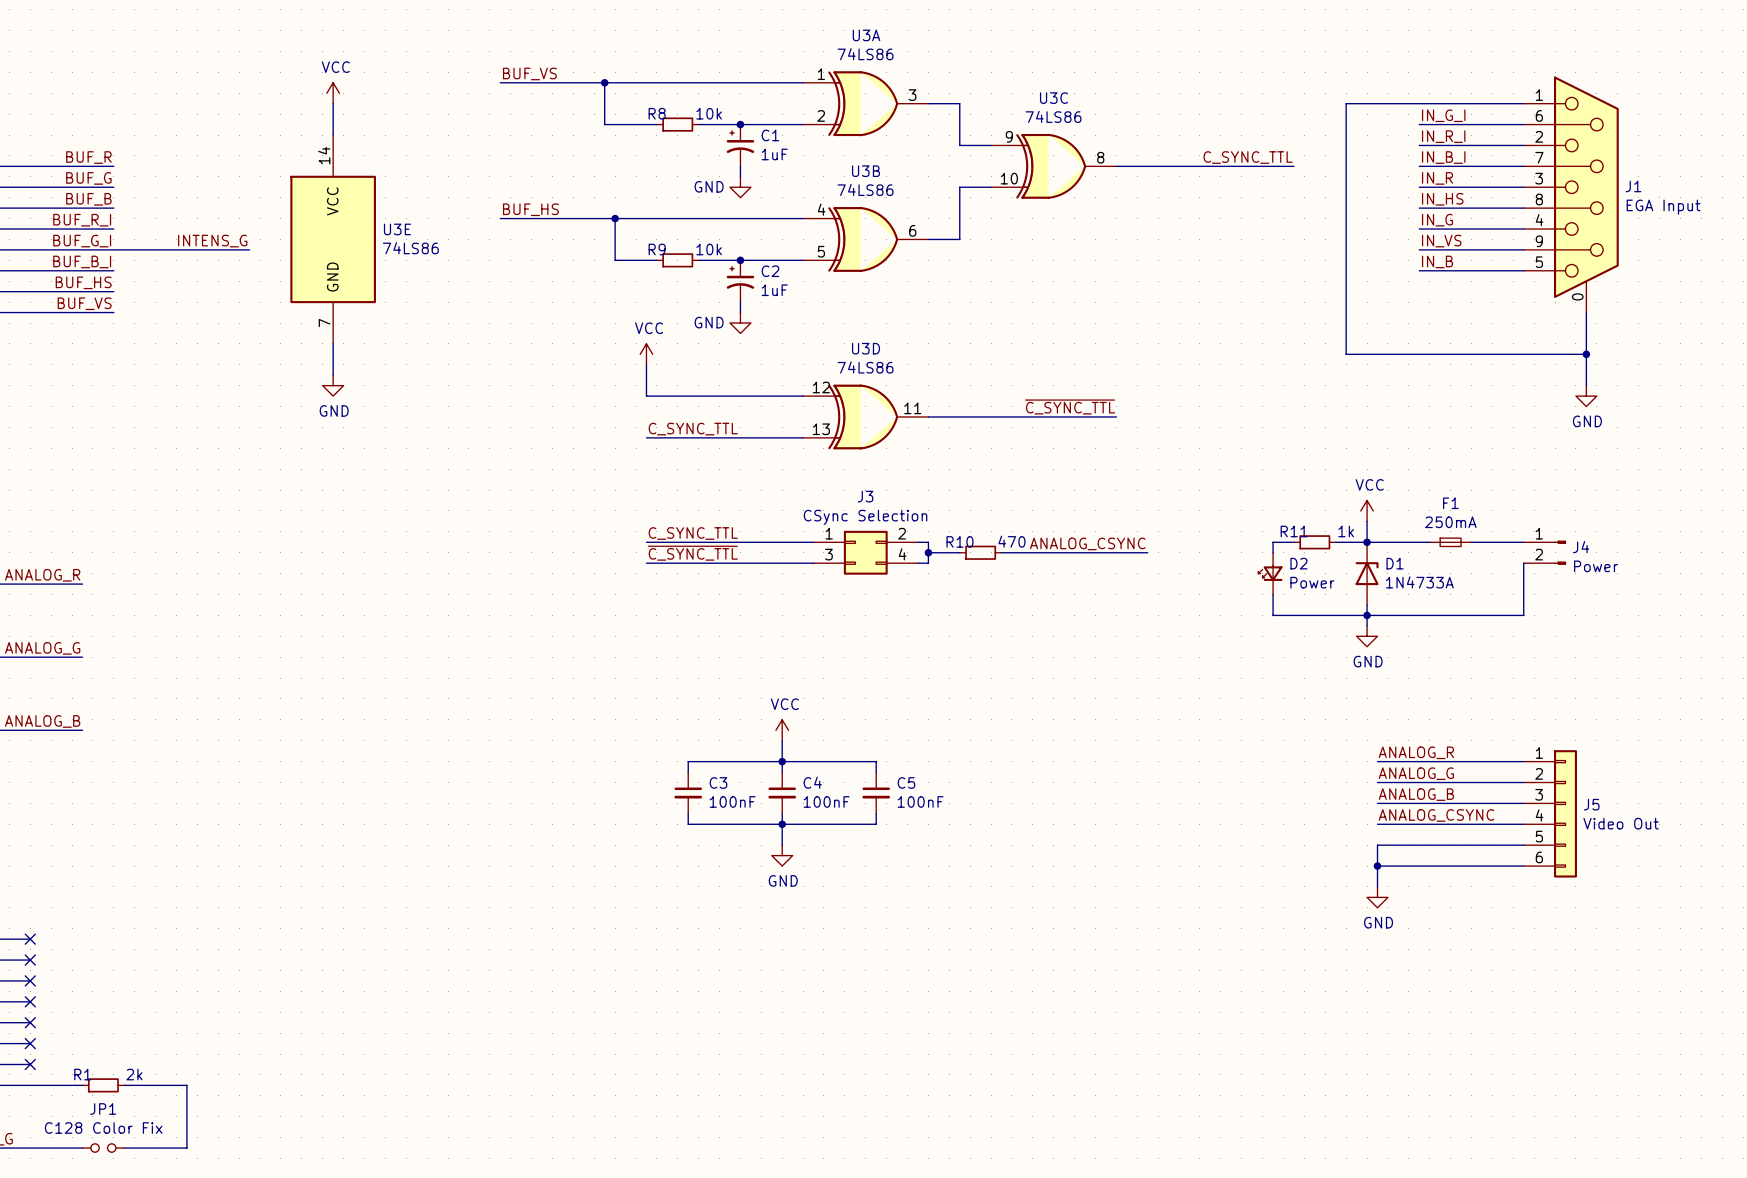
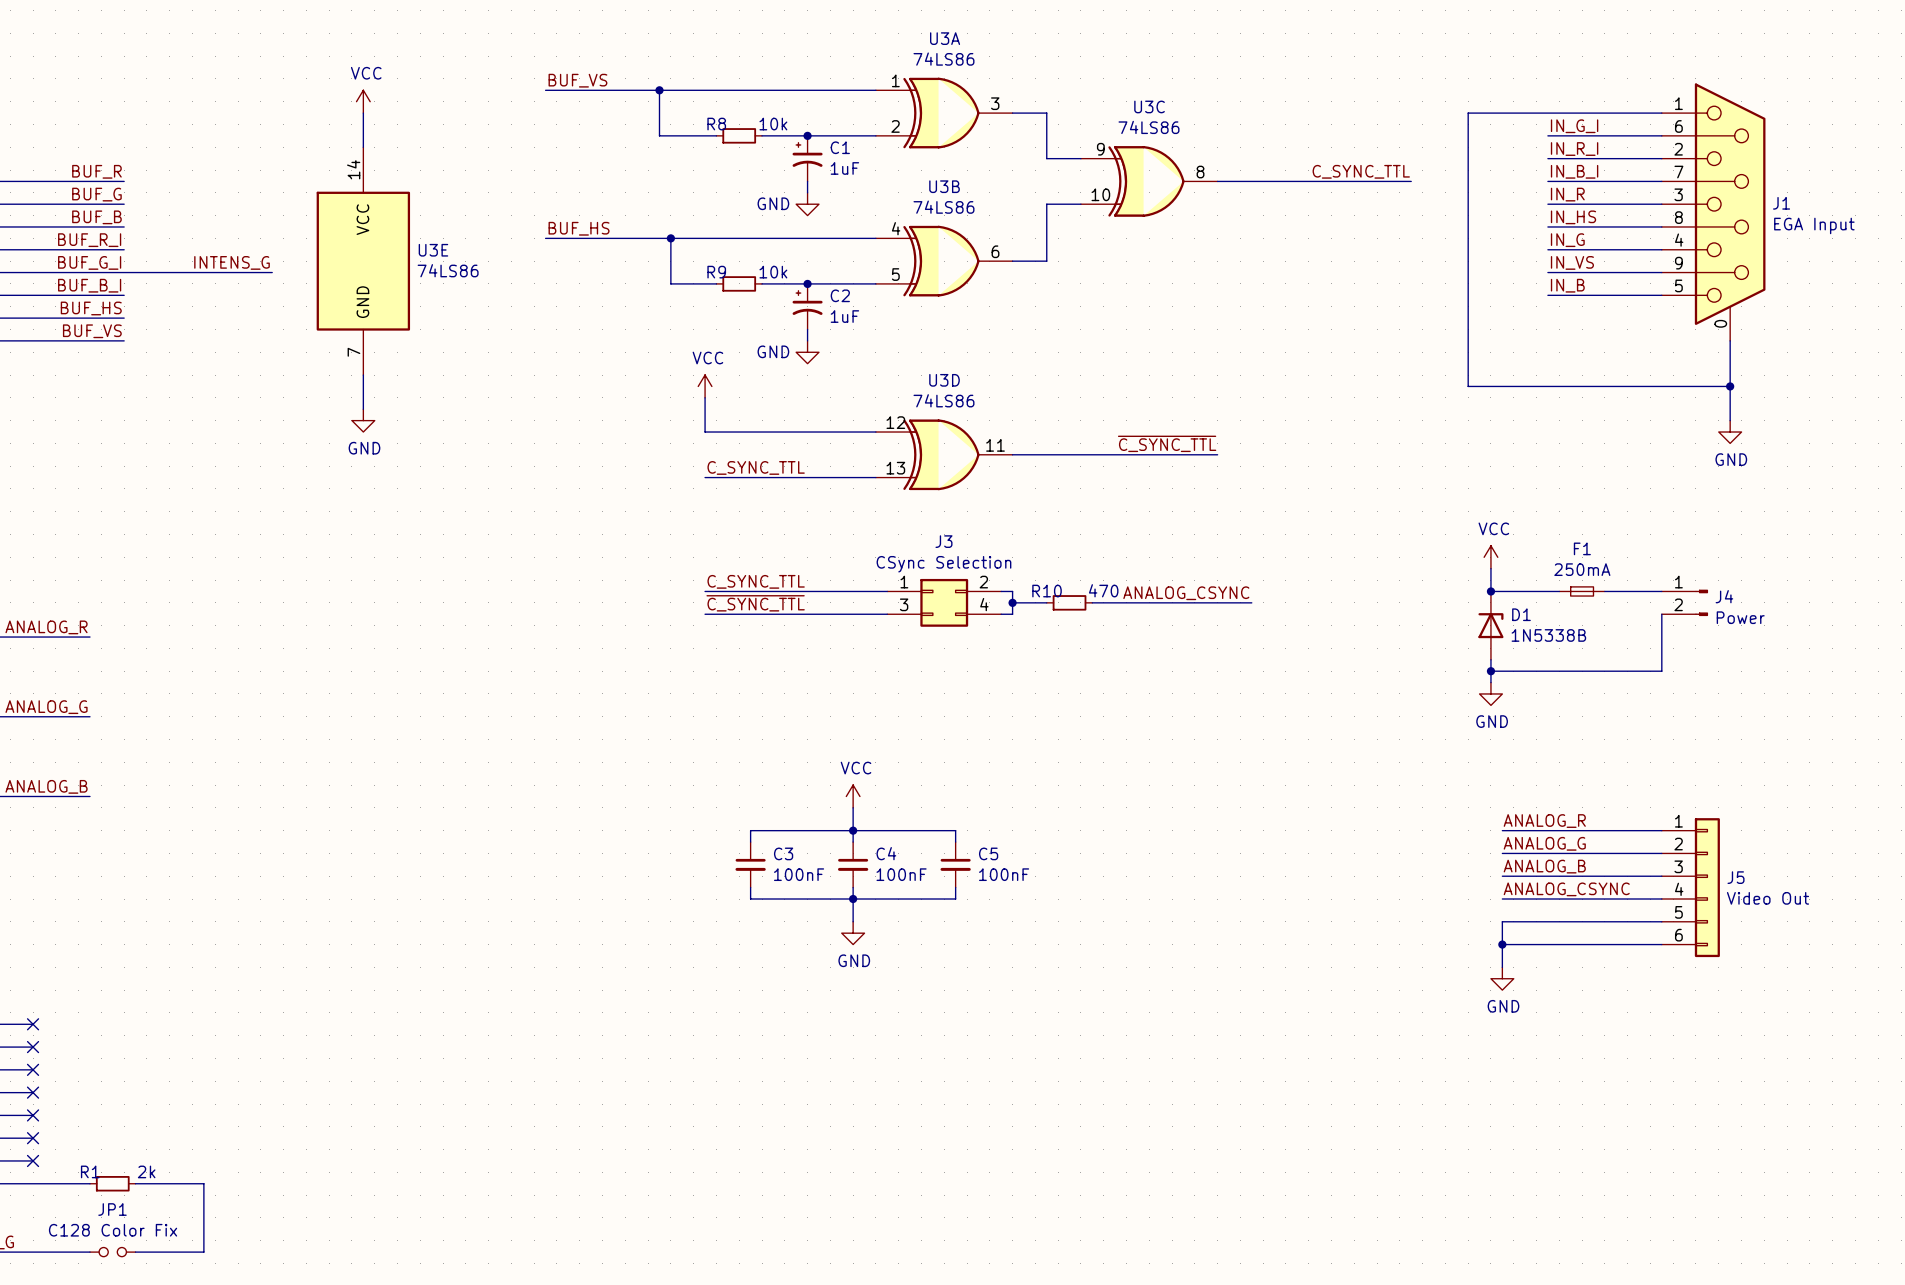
wire: (1293, 542) (1273, 542) (1273, 552) -> none
R11: 1k (1314, 542) -> none
wire: (1335, 542) (1367, 542) -> none
D2: Power (1270, 573) -> none
D1 value: 1N4733A (1419, 582) -> 1N5338B (1548, 635)
wire: (1273, 594) (1273, 615) (1367, 615) -> none

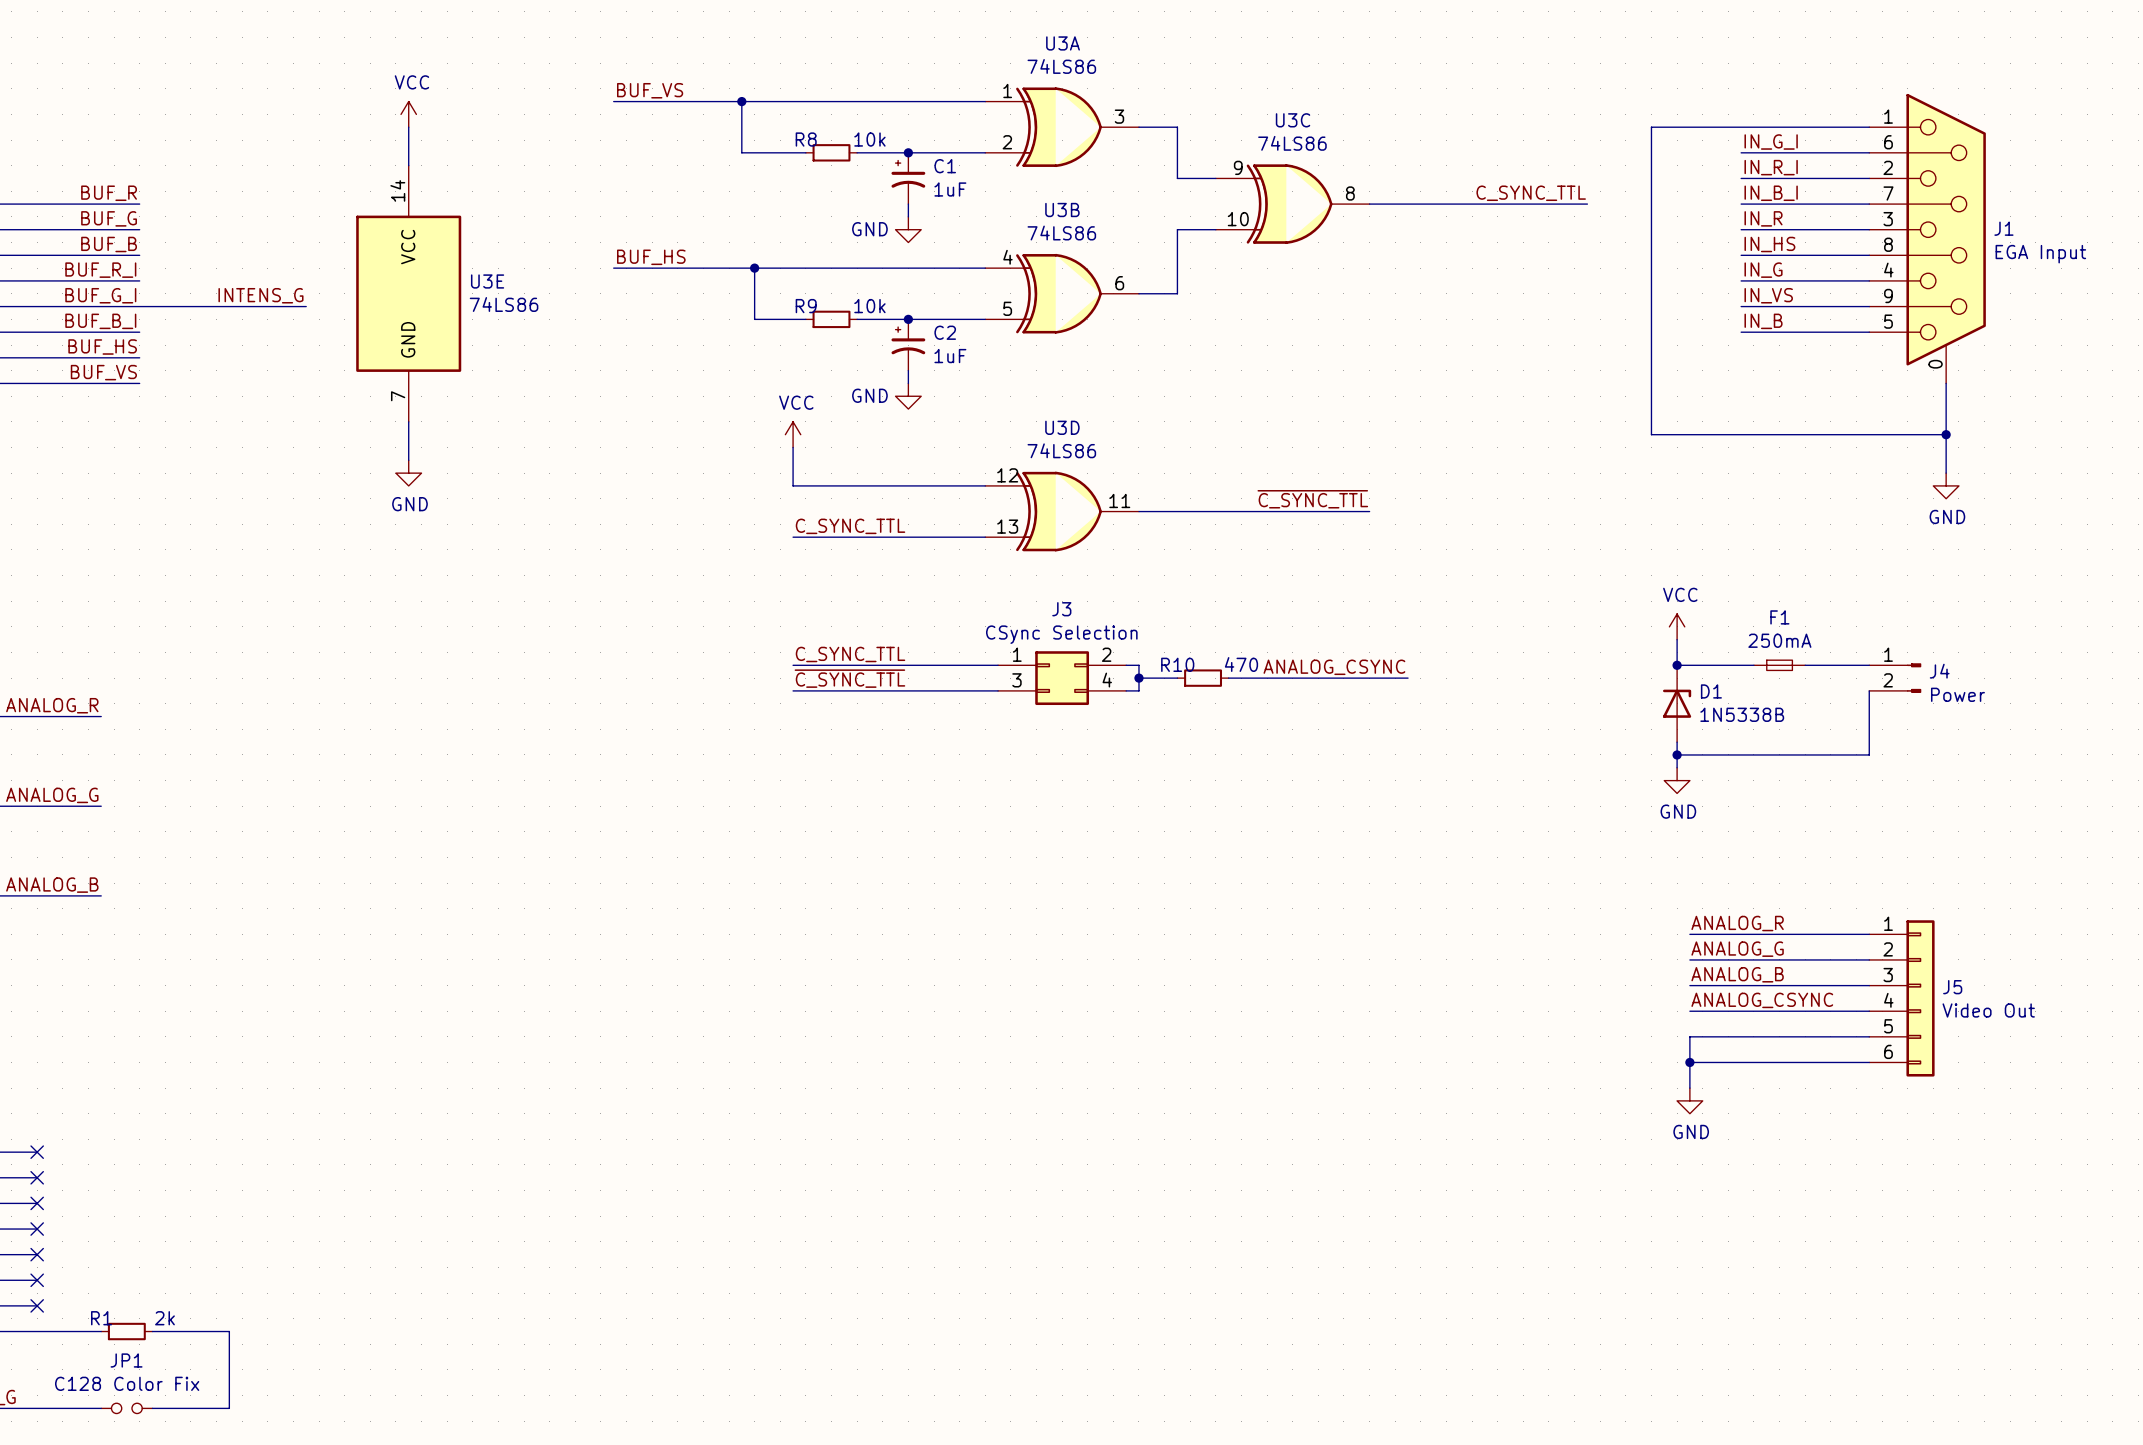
power symbol: VCC (853, 796) -> none
wire: (853, 807) (853, 842) -> none
junction: (853, 830) -> none
wire: (750, 842) (750, 830) (955, 830) (955, 842) -> none
C3: 100nF (750, 864) -> none
C4: 100nF (853, 864) -> none
C5: 100nF (955, 864) -> none
wire: (750, 887) (750, 899) (955, 899) (955, 887) -> none
wire: (853, 887) (853, 921) -> none
junction: (853, 899) -> none
power symbol: GND (853, 933) -> none

